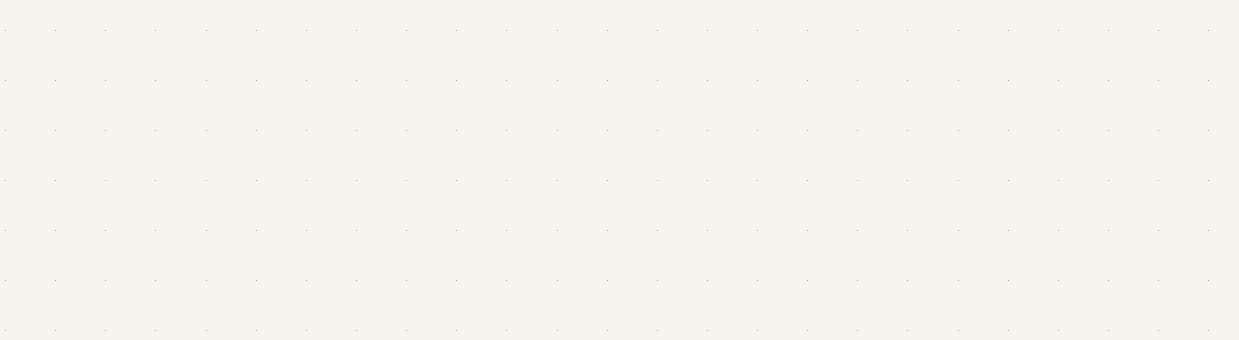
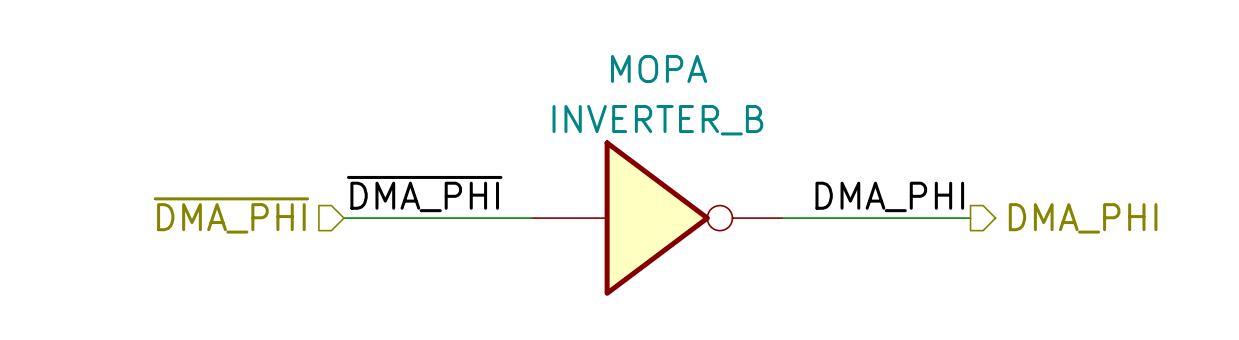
label: none -> ~{DMA_PHI} (424, 194)
label: none -> DMA_PHI (889, 196)
hierarchical label: none -> ~{DMA_PHI} (231, 215)
wire: none -> (343, 218) (531, 218)
MOPA: none -> INVERTER_B (657, 218)
wire: none -> (782, 218) (970, 218)
hierarchical label: none -> DMA_PHI (1083, 218)

